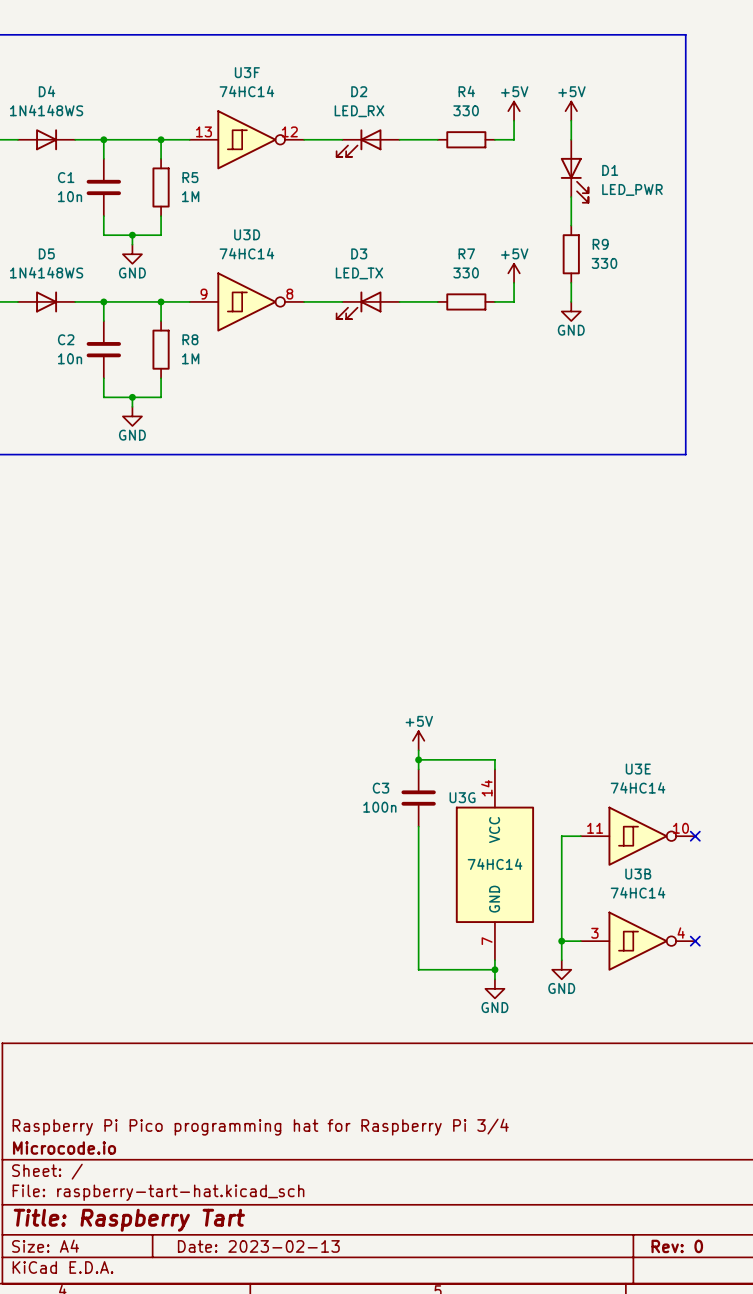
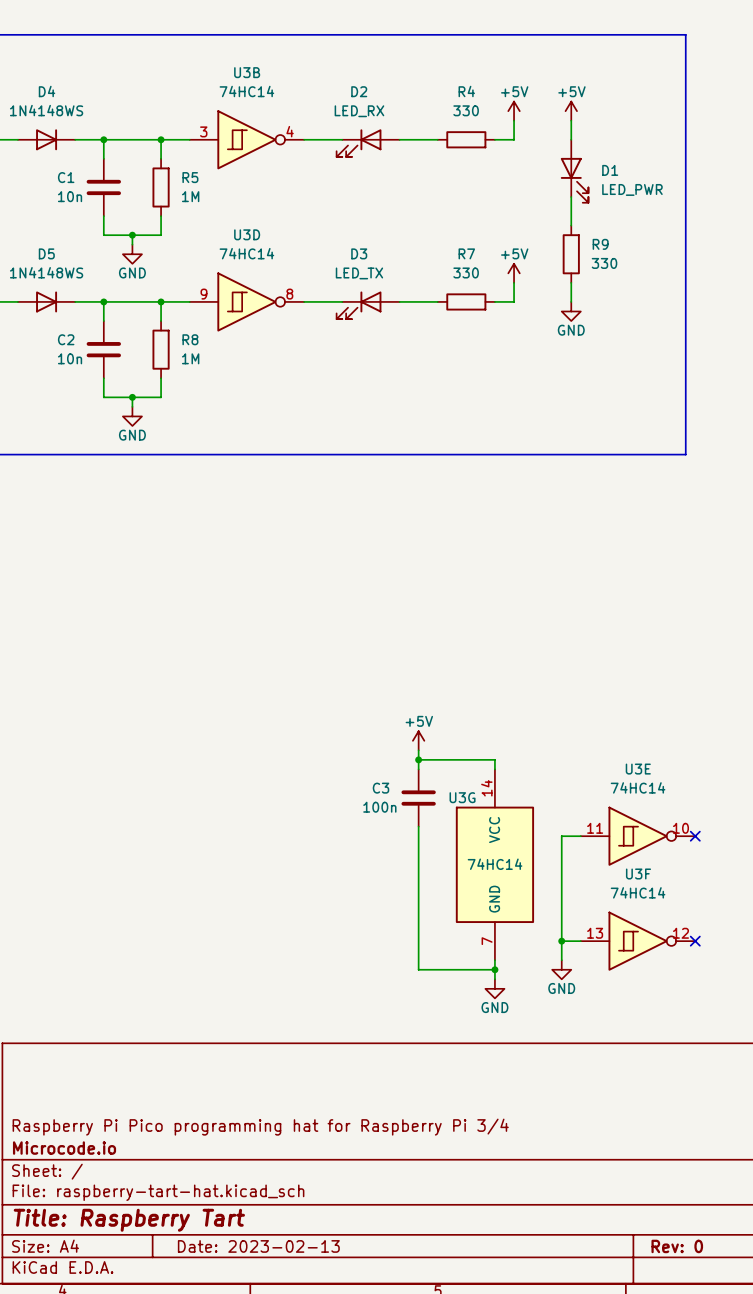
U3F position: (246, 139) -> (638, 941)
U3B position: (638, 941) -> (246, 139)

